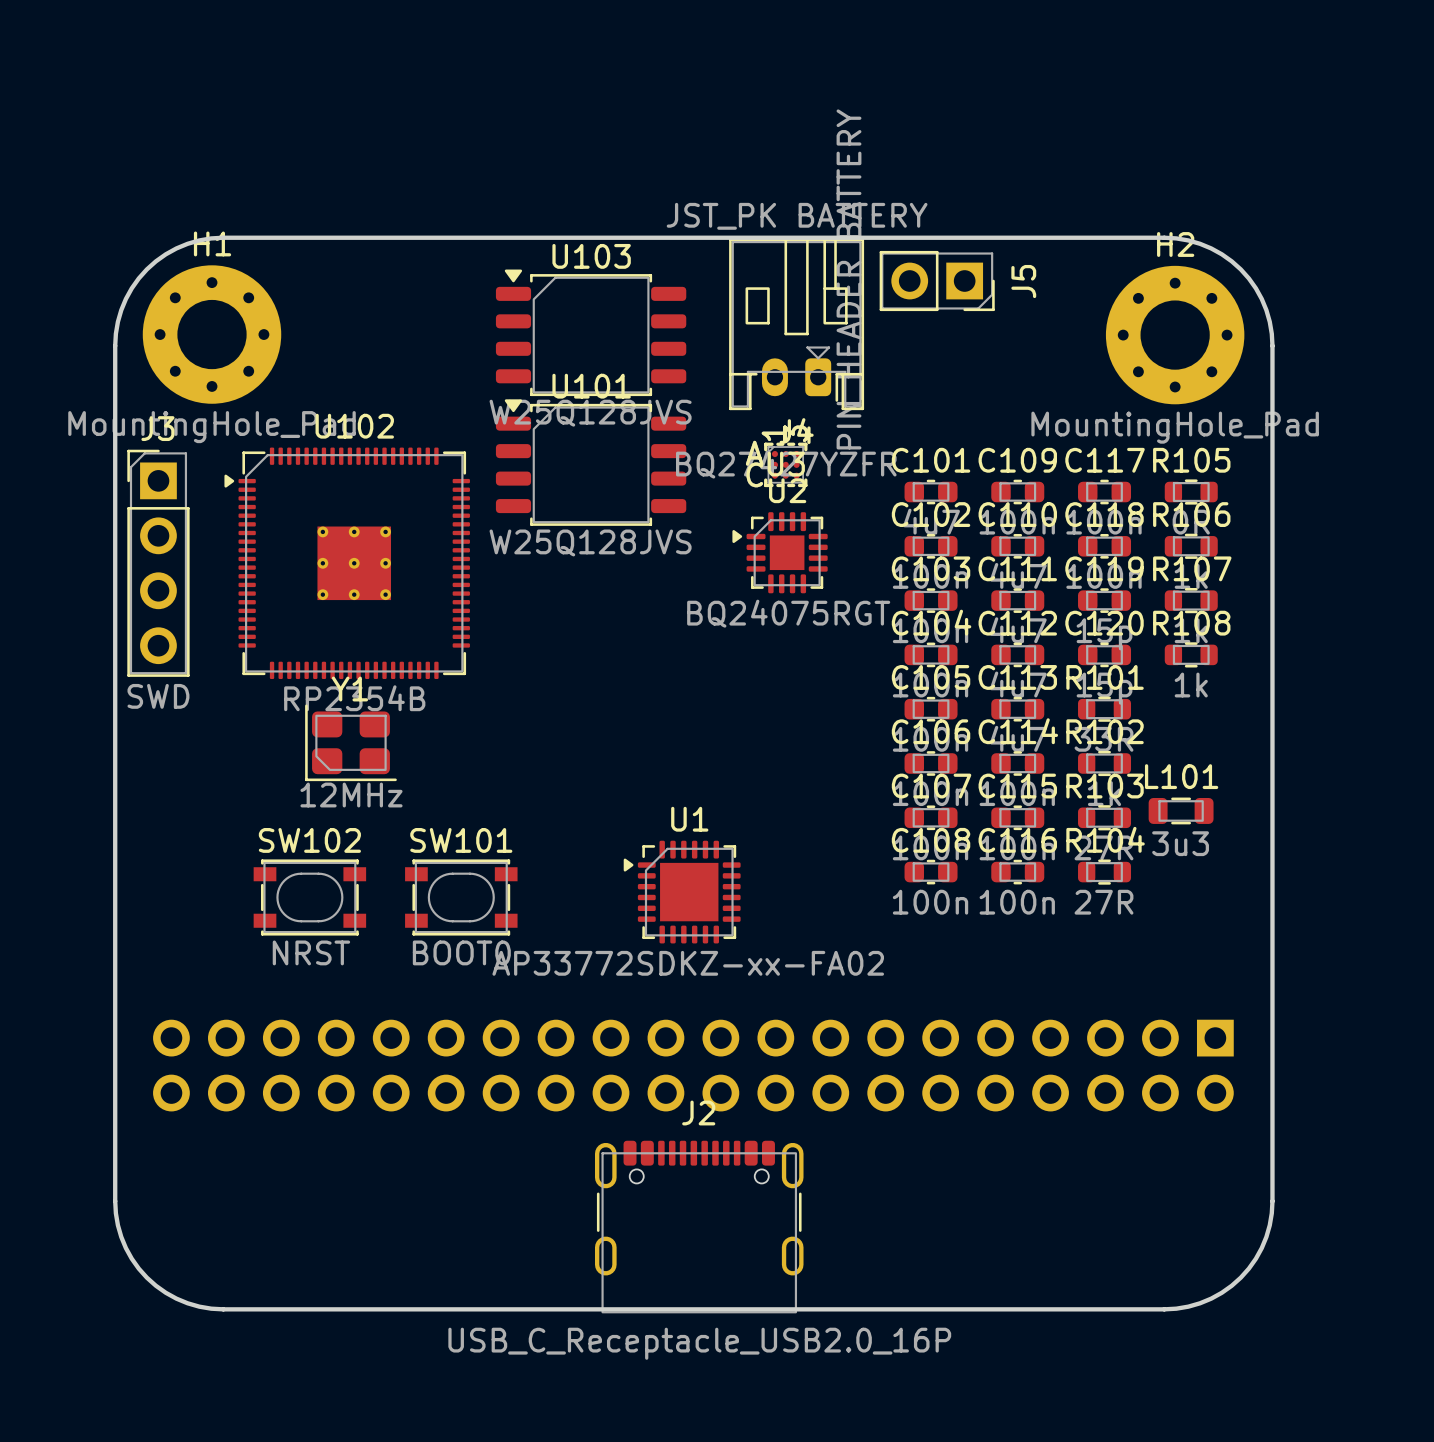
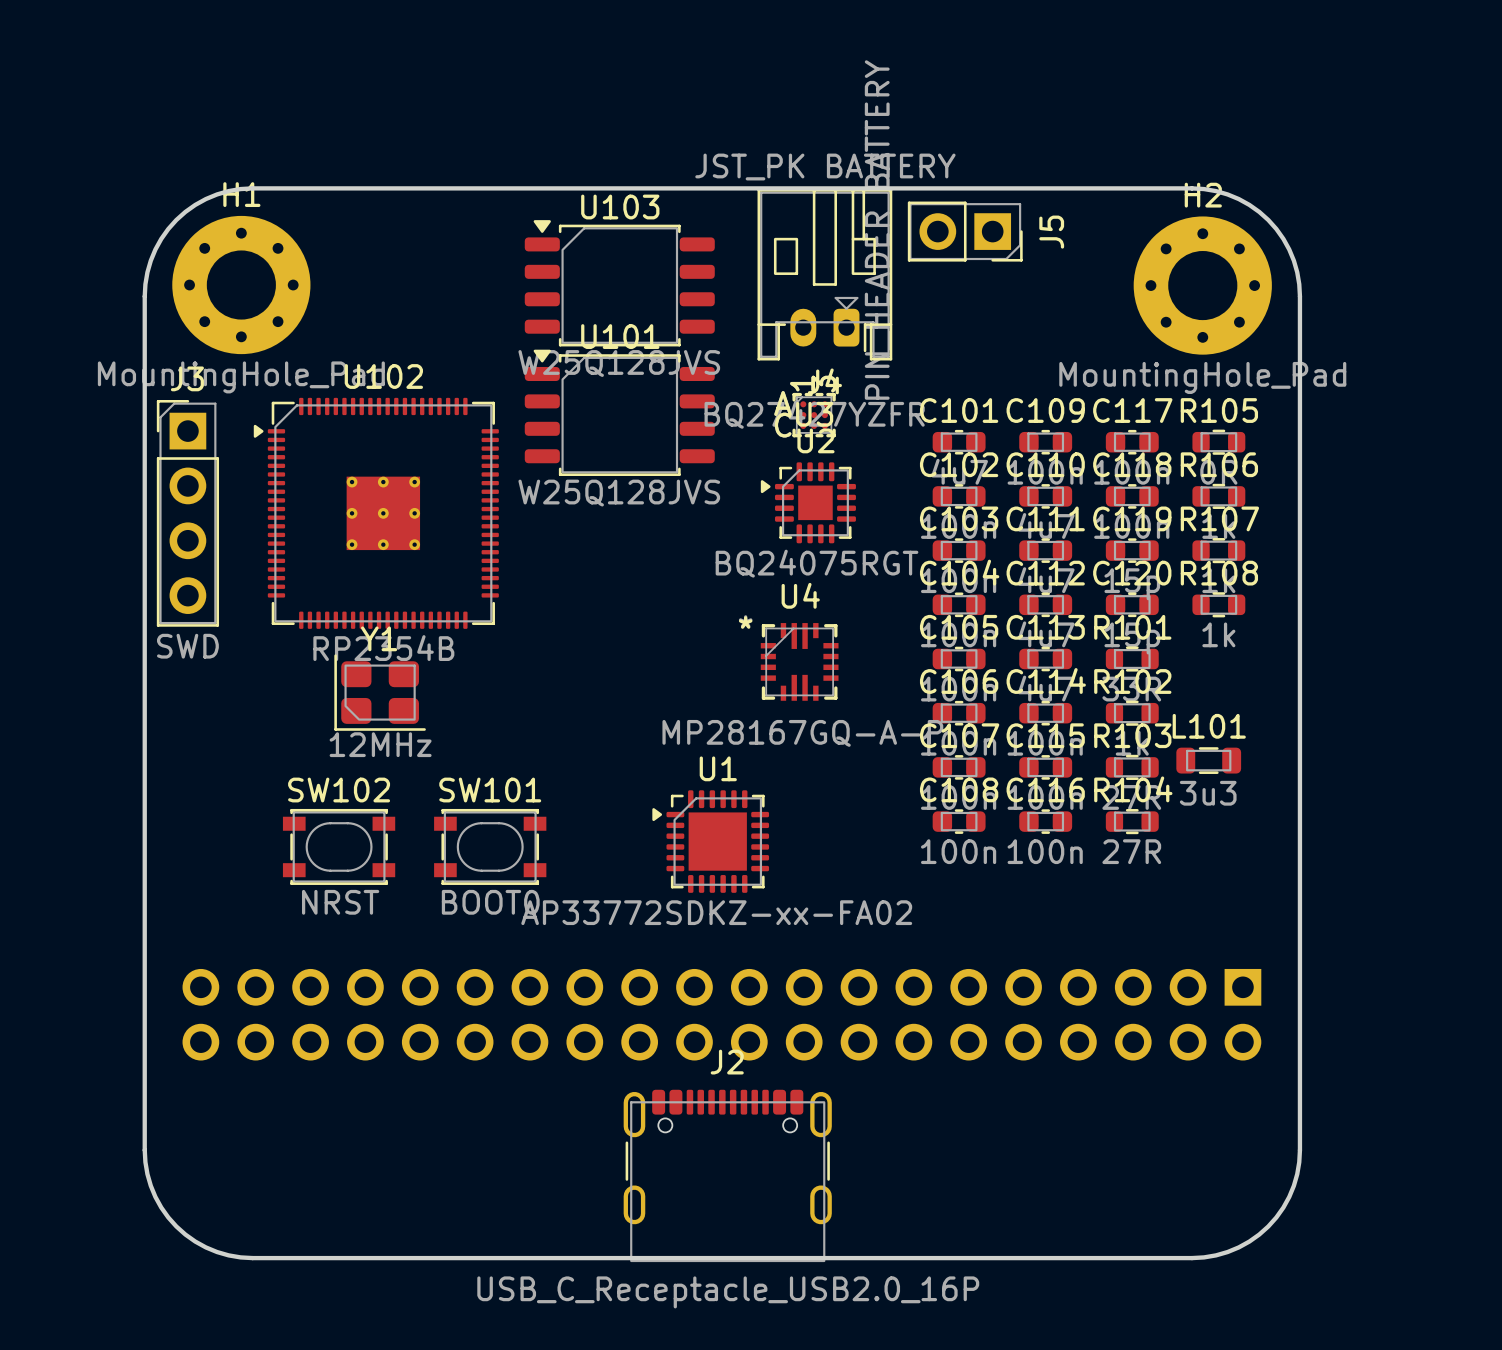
U4: none -> MP28167GQ-A-P (799, 661)

